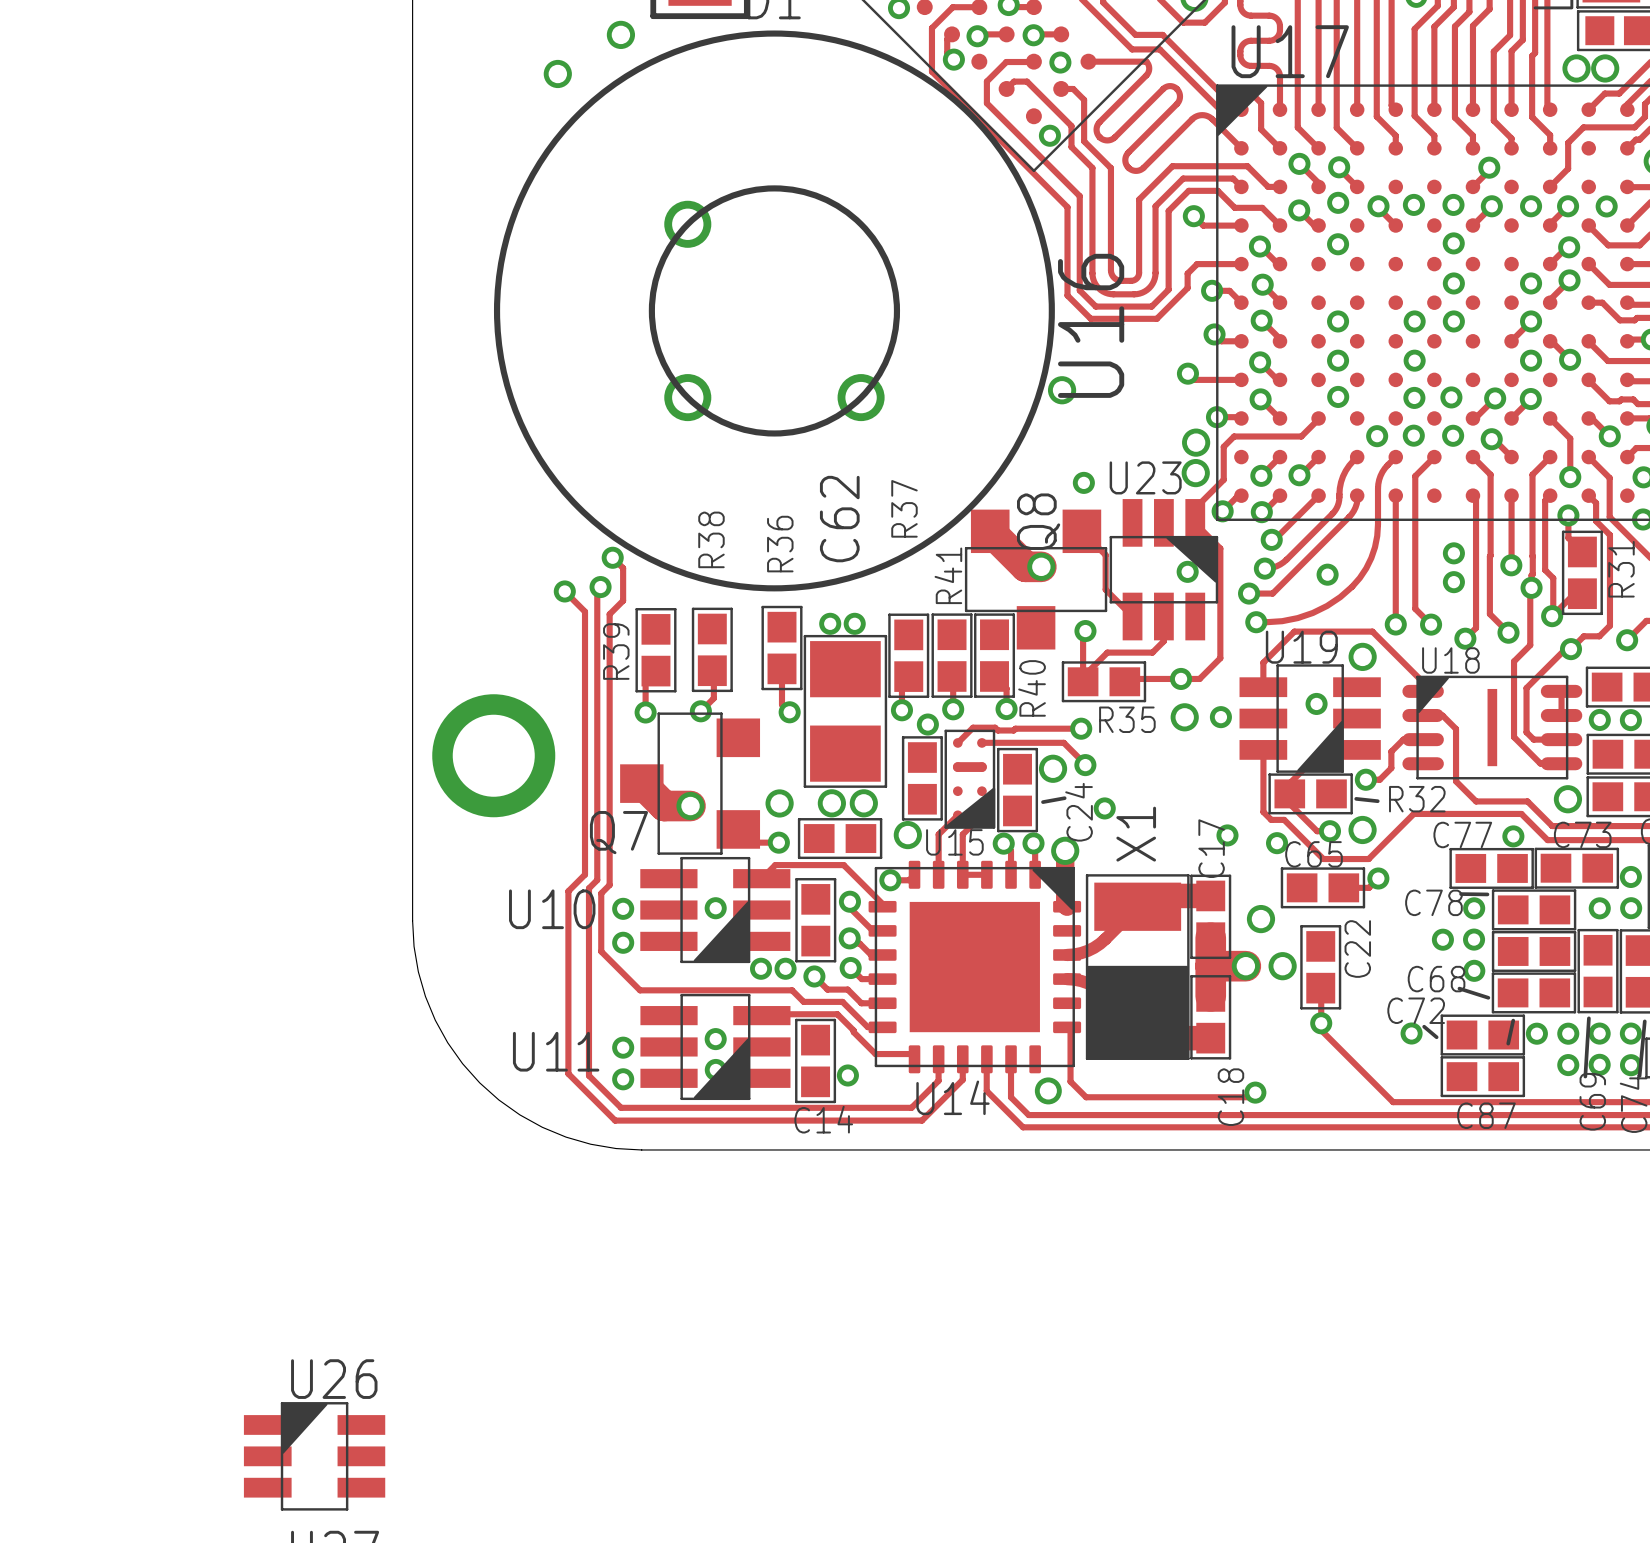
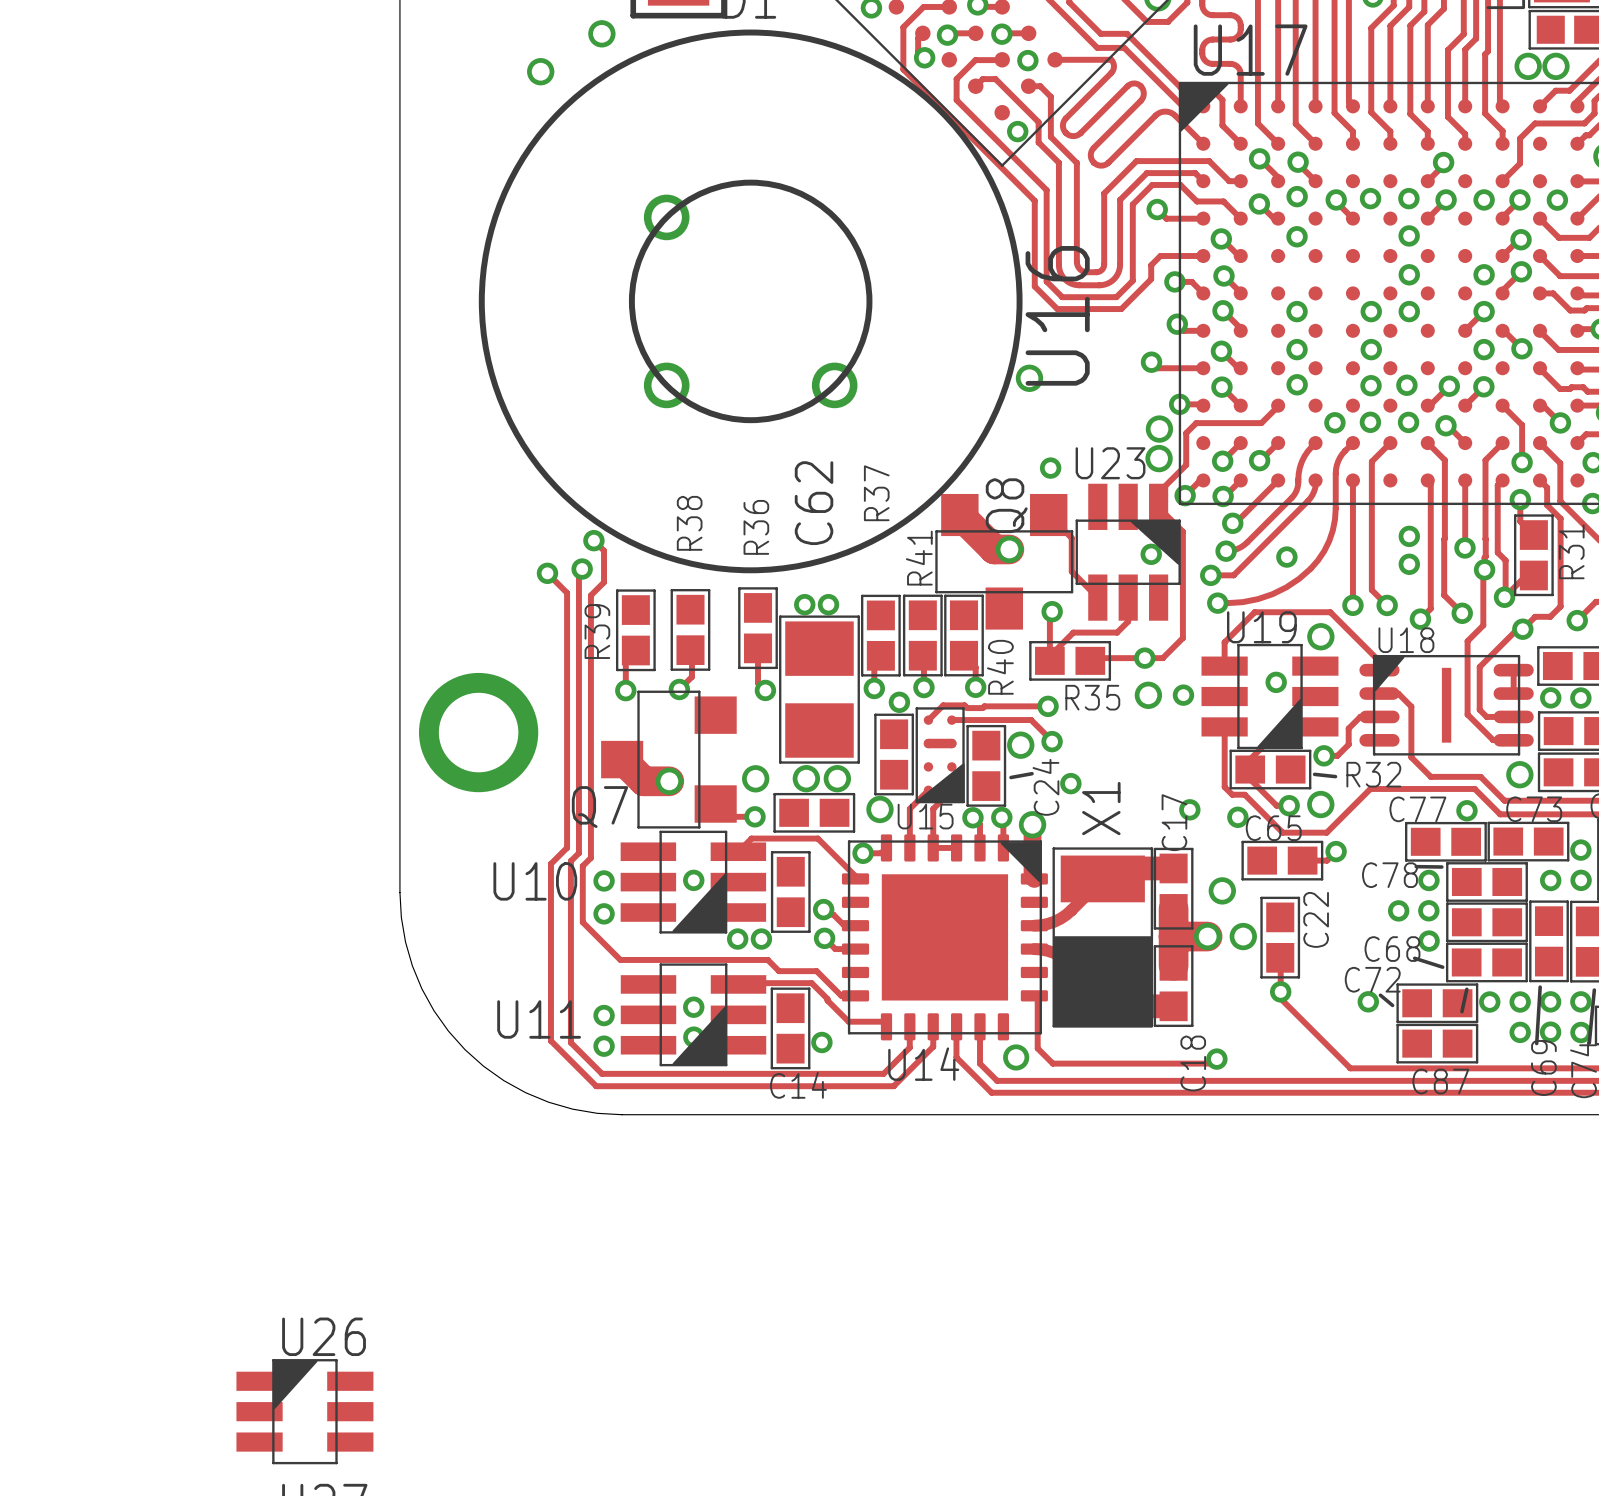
track: (849, 901) (849, 907) (872, 930) (882, 930) -> none
via: (849, 901) -> none
track: (814, 976) (827, 989) (847, 989) (861, 1003) (882, 1003) -> none
via: (814, 976) -> none

